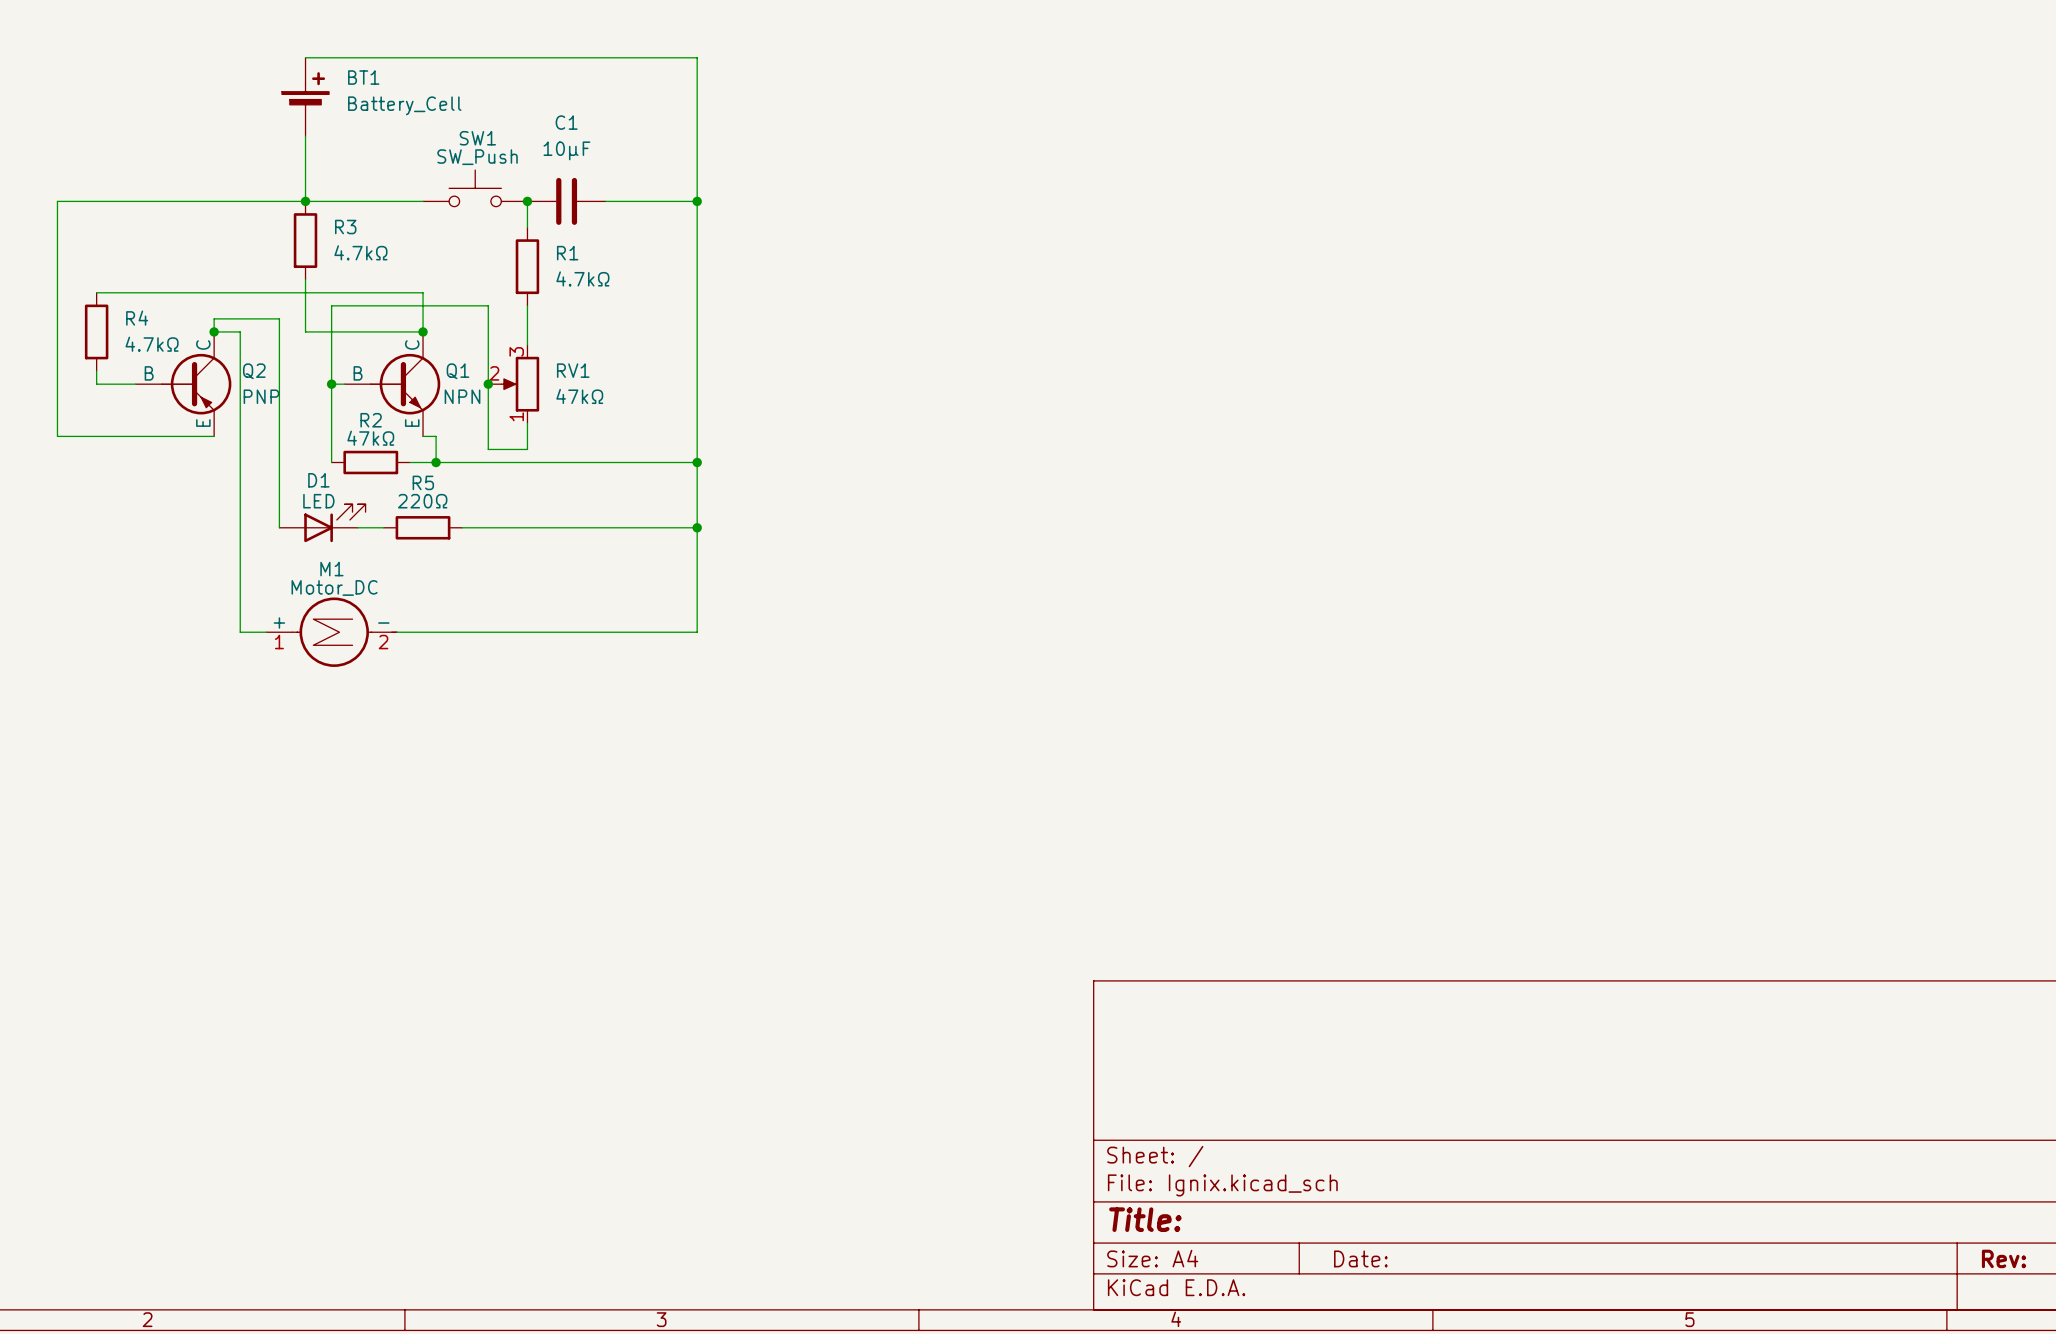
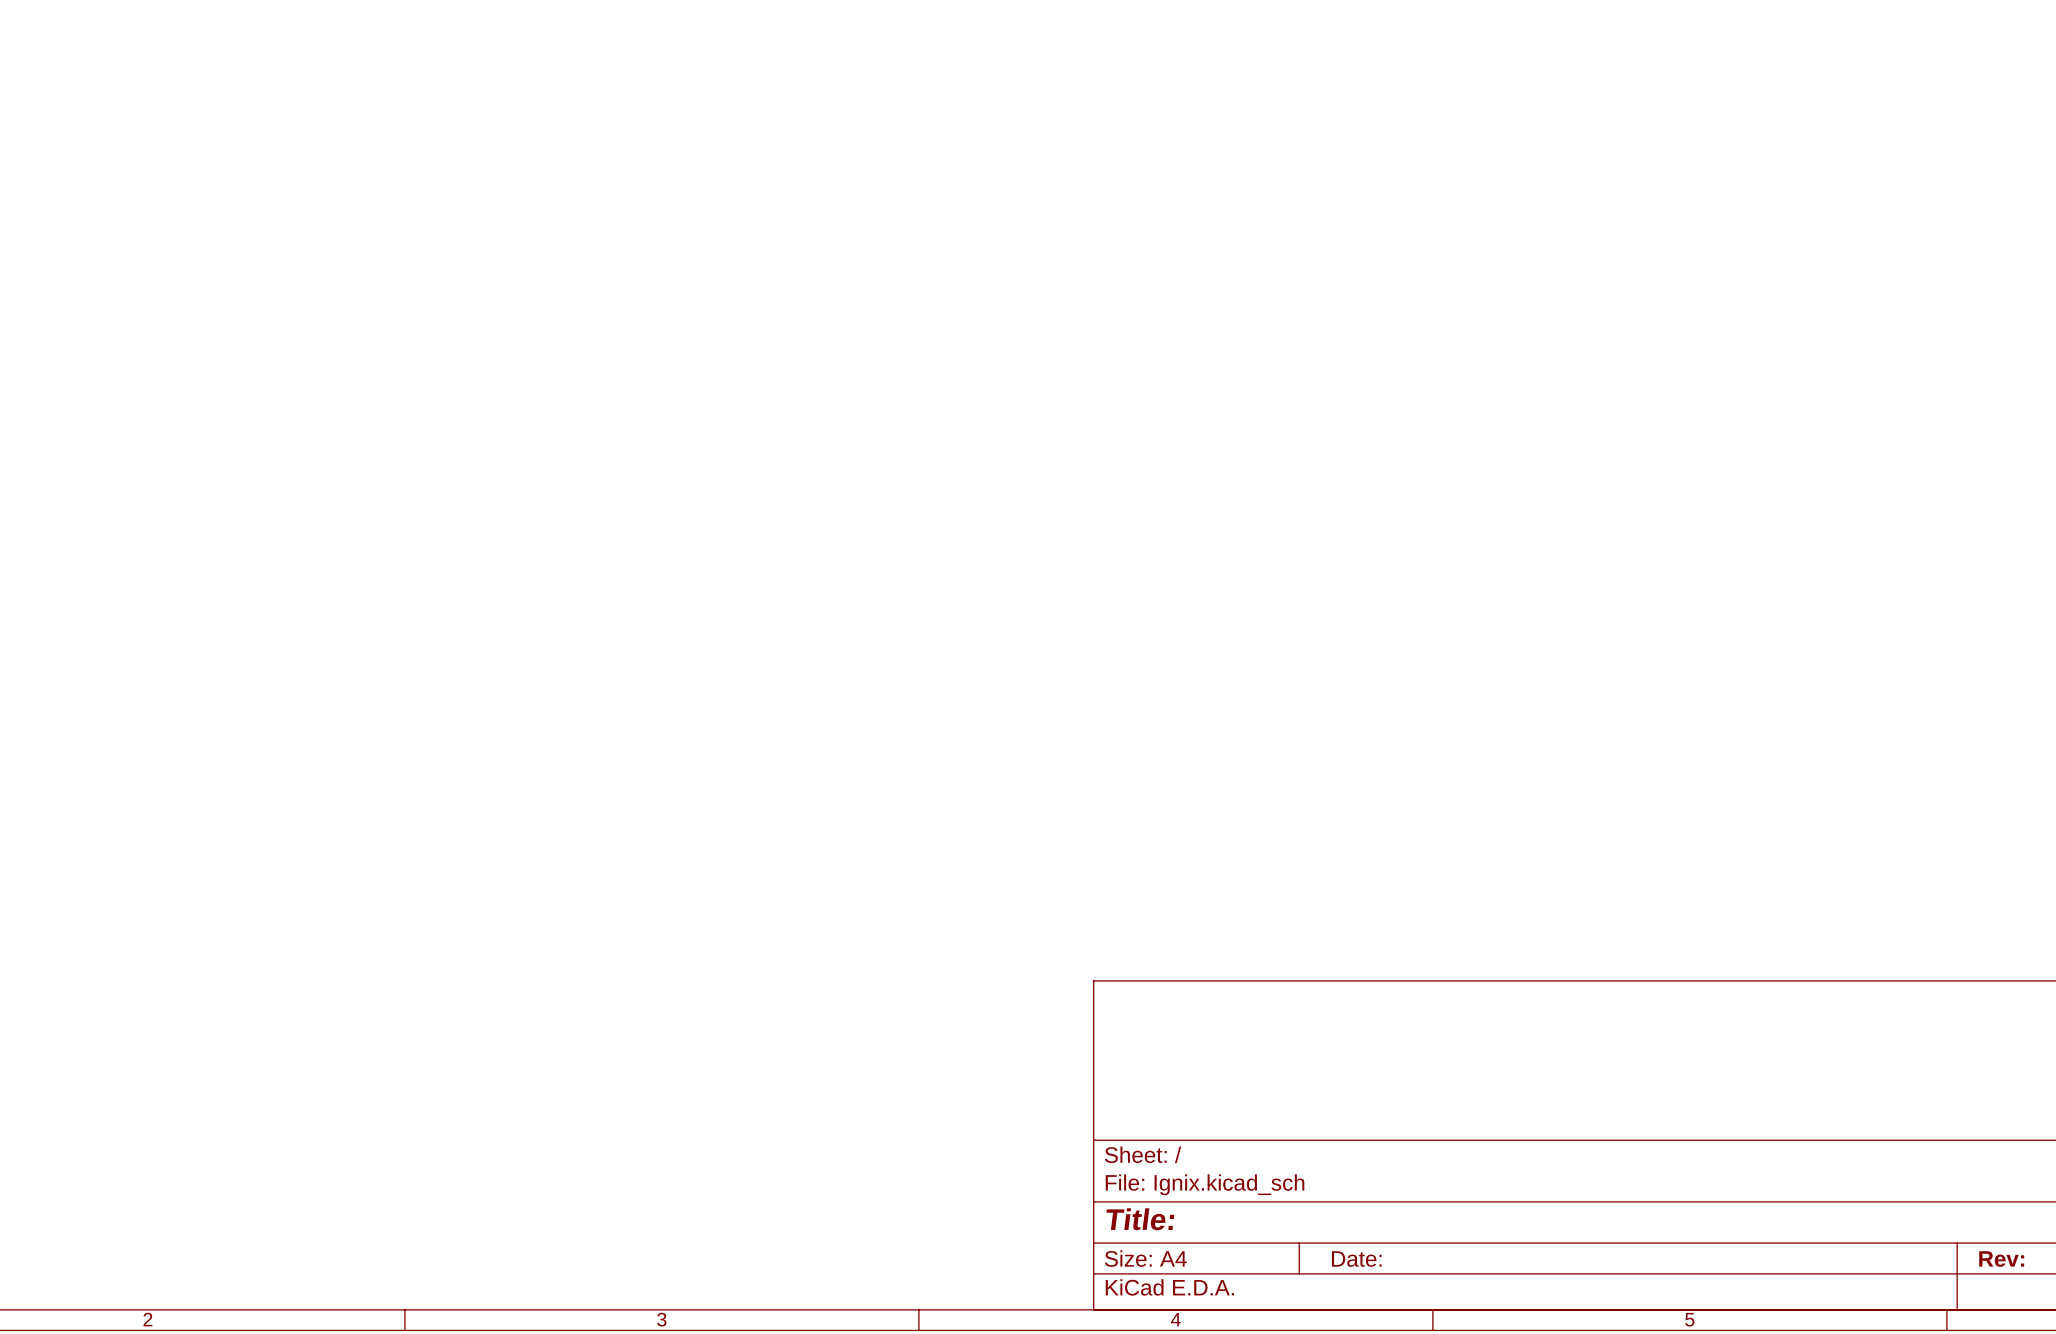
wire: (305, 57) (697, 57) (697, 632) (396, 632) -> none
BT1: Battery_Cell (305, 96) -> none
wire: (305, 136) (305, 201) -> none
SW1: SW_Push (475, 188) -> none
junction: (305, 201) -> none
wire: (423, 201) (57, 201) (57, 436) (214, 436) -> none
wire: (527, 201) (527, 227) -> none
junction: (527, 201) -> none
C1: 10µF (566, 201) -> none
wire: (605, 201) (697, 201) -> none
junction: (697, 201) -> none
R3: 4.7kΩ (305, 240) -> none
R1: 4.7kΩ (527, 266) -> none
wire: (305, 279) (305, 331) (423, 331) (423, 292) (96, 292) -> none
wire: (527, 305) (527, 345) -> none
R4: 4.7kΩ (96, 331) -> none
junction: (214, 331) -> none
junction: (423, 331) -> none
wire: (96, 371) (96, 384) (135, 384) -> none
Q2: PNP (183, 384) -> none
wire: (331, 384) (344, 384) -> none
junction: (331, 384) -> none
Q1: NPN (392, 384) -> none
junction: (488, 384) -> none
RV1: 47kΩ (513, 384) -> none
wire: (527, 423) (527, 449) (488, 449) (488, 305) (331, 305) (331, 462) -> none
wire: (423, 436) (436, 436) (436, 462) -> none
R2: 47kΩ (370, 462) -> none
wire: (409, 462) (697, 462) -> none
junction: (436, 462) -> none
junction: (697, 462) -> none
D1: LED (322, 523) -> none
wire: (279, 527) (279, 318) (214, 318) (214, 331) (240, 331) (240, 632) (266, 632) -> none
wire: (357, 527) (383, 527) -> none
R5: 220Ω (423, 527) -> none
wire: (462, 527) (697, 527) -> none
junction: (697, 527) -> none
M1: Motor_DC (331, 632) -> none

